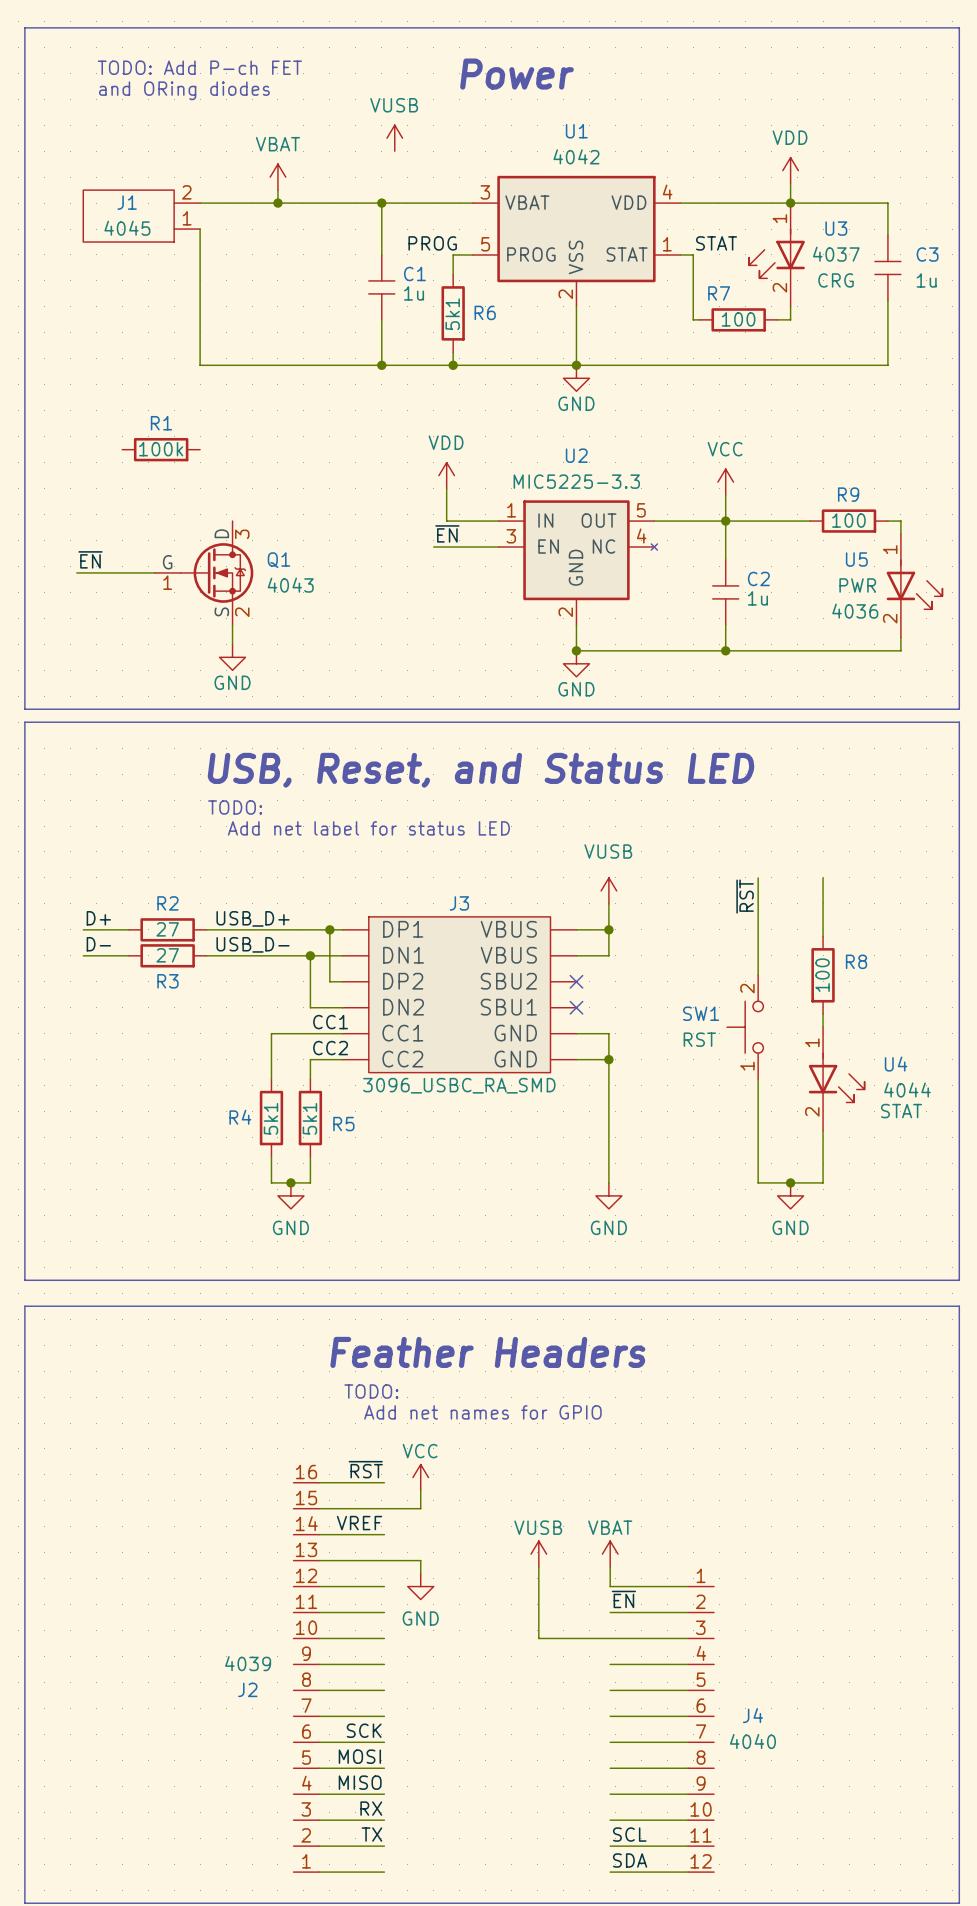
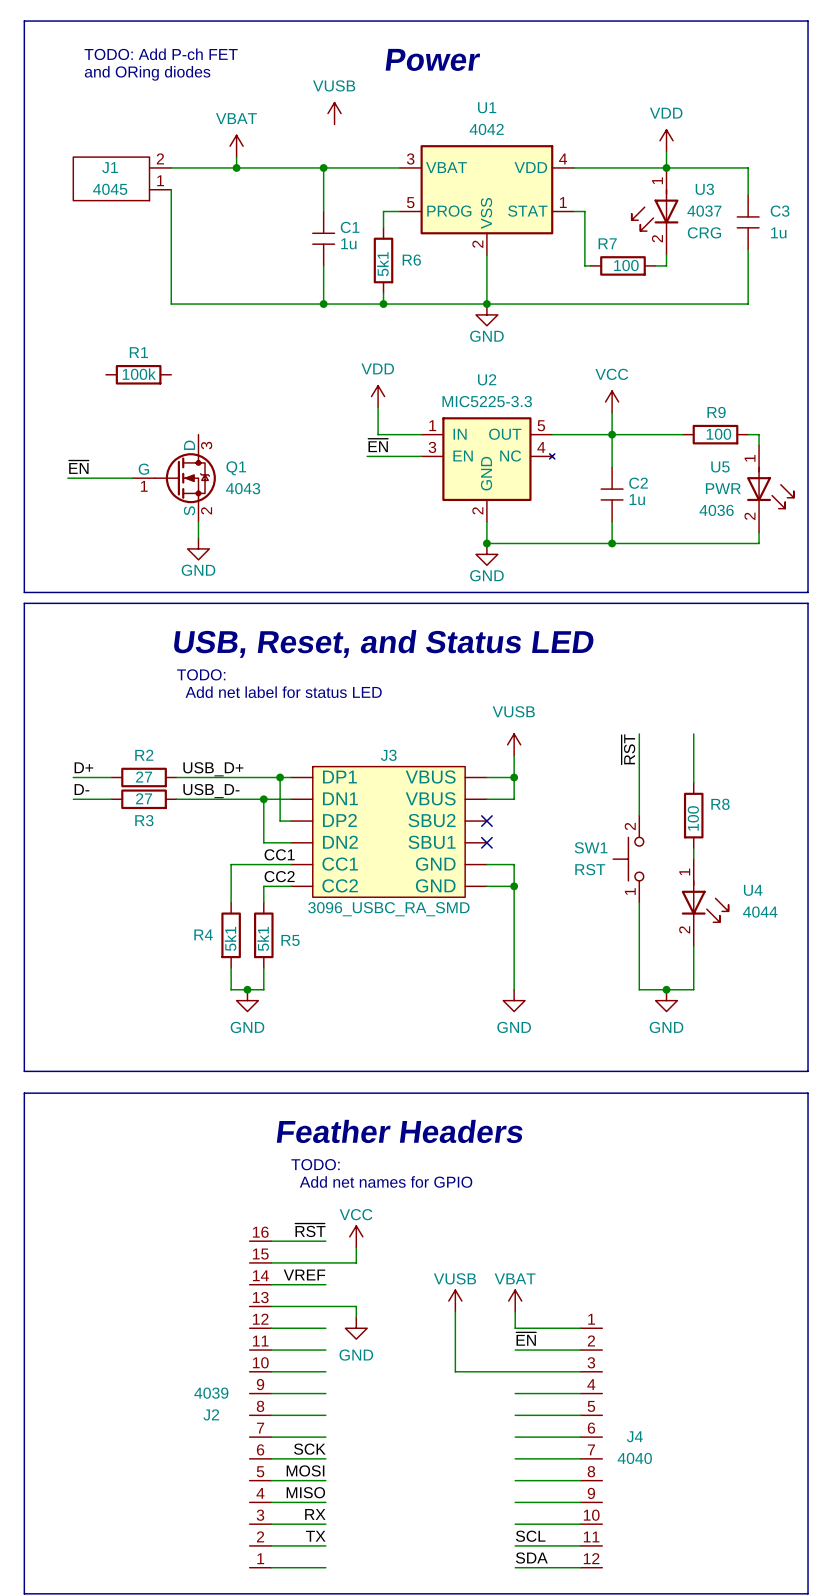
label: PROG (432, 243) -> none
label: STAT (716, 243) -> none
U4 value: STAT (901, 1111) -> none

